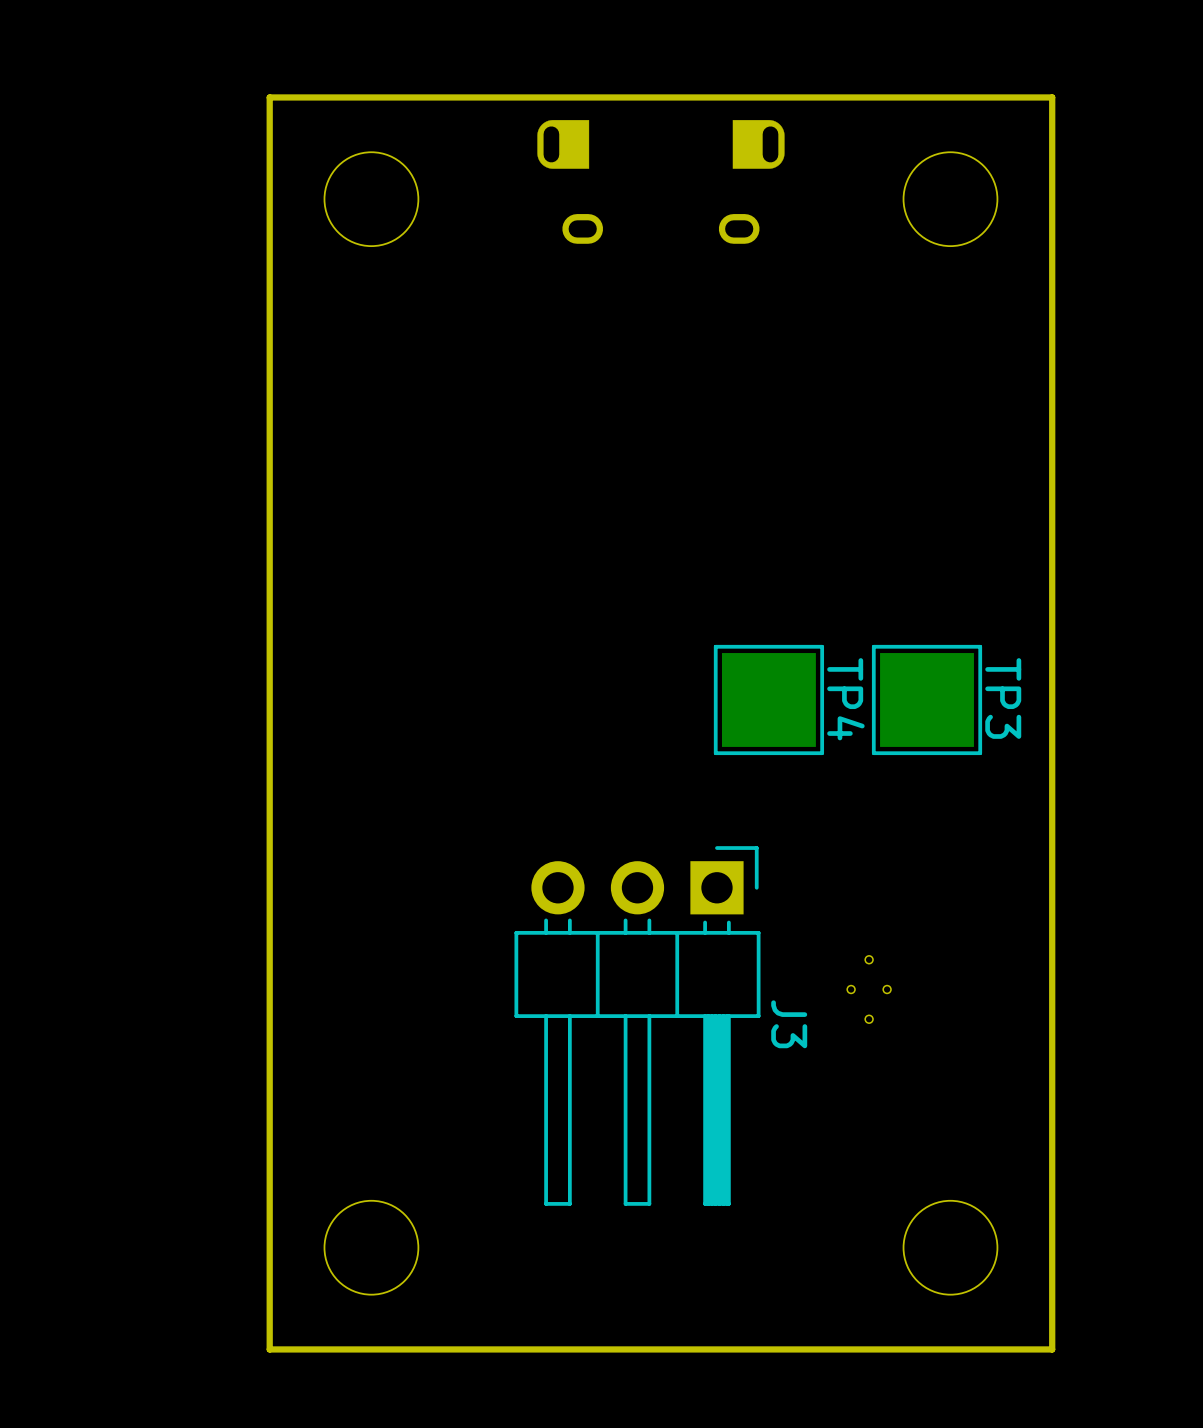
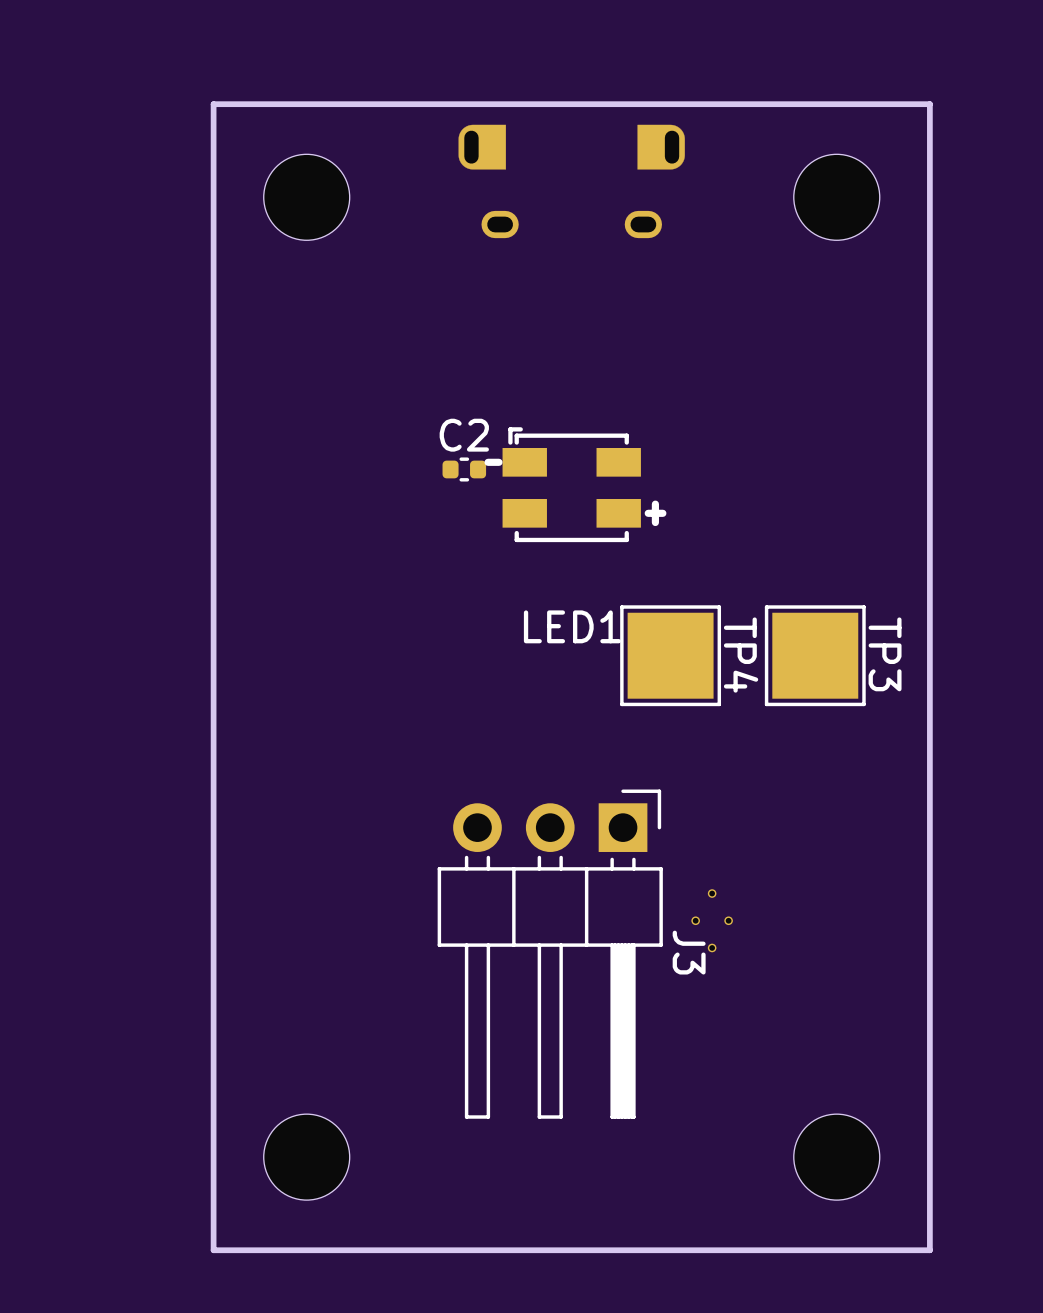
C2: none -> (464, 469)
LED1: none -> (575, 484)
part position: (869, 989) -> (712, 920)

